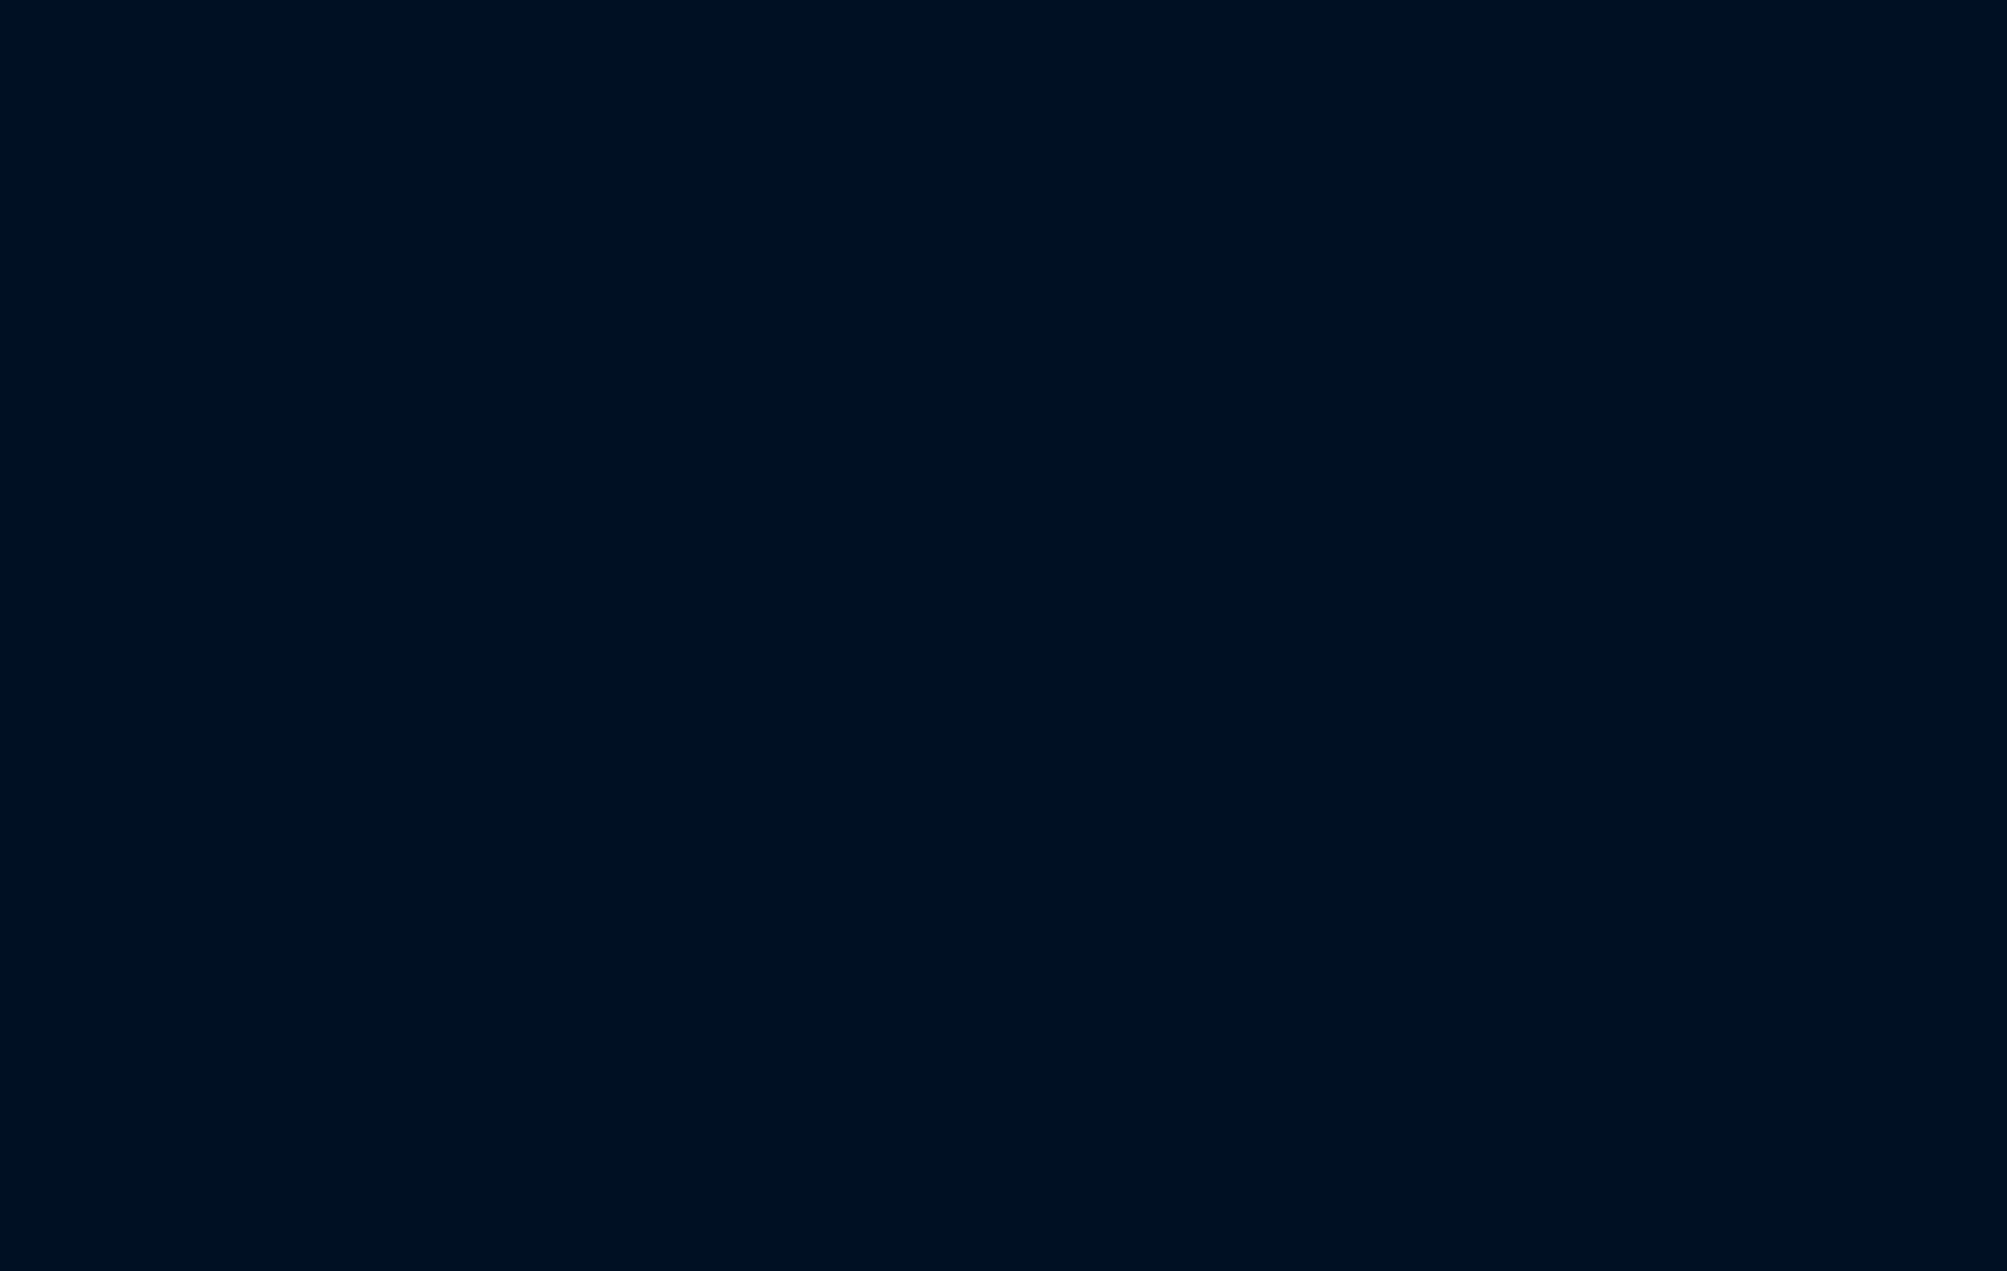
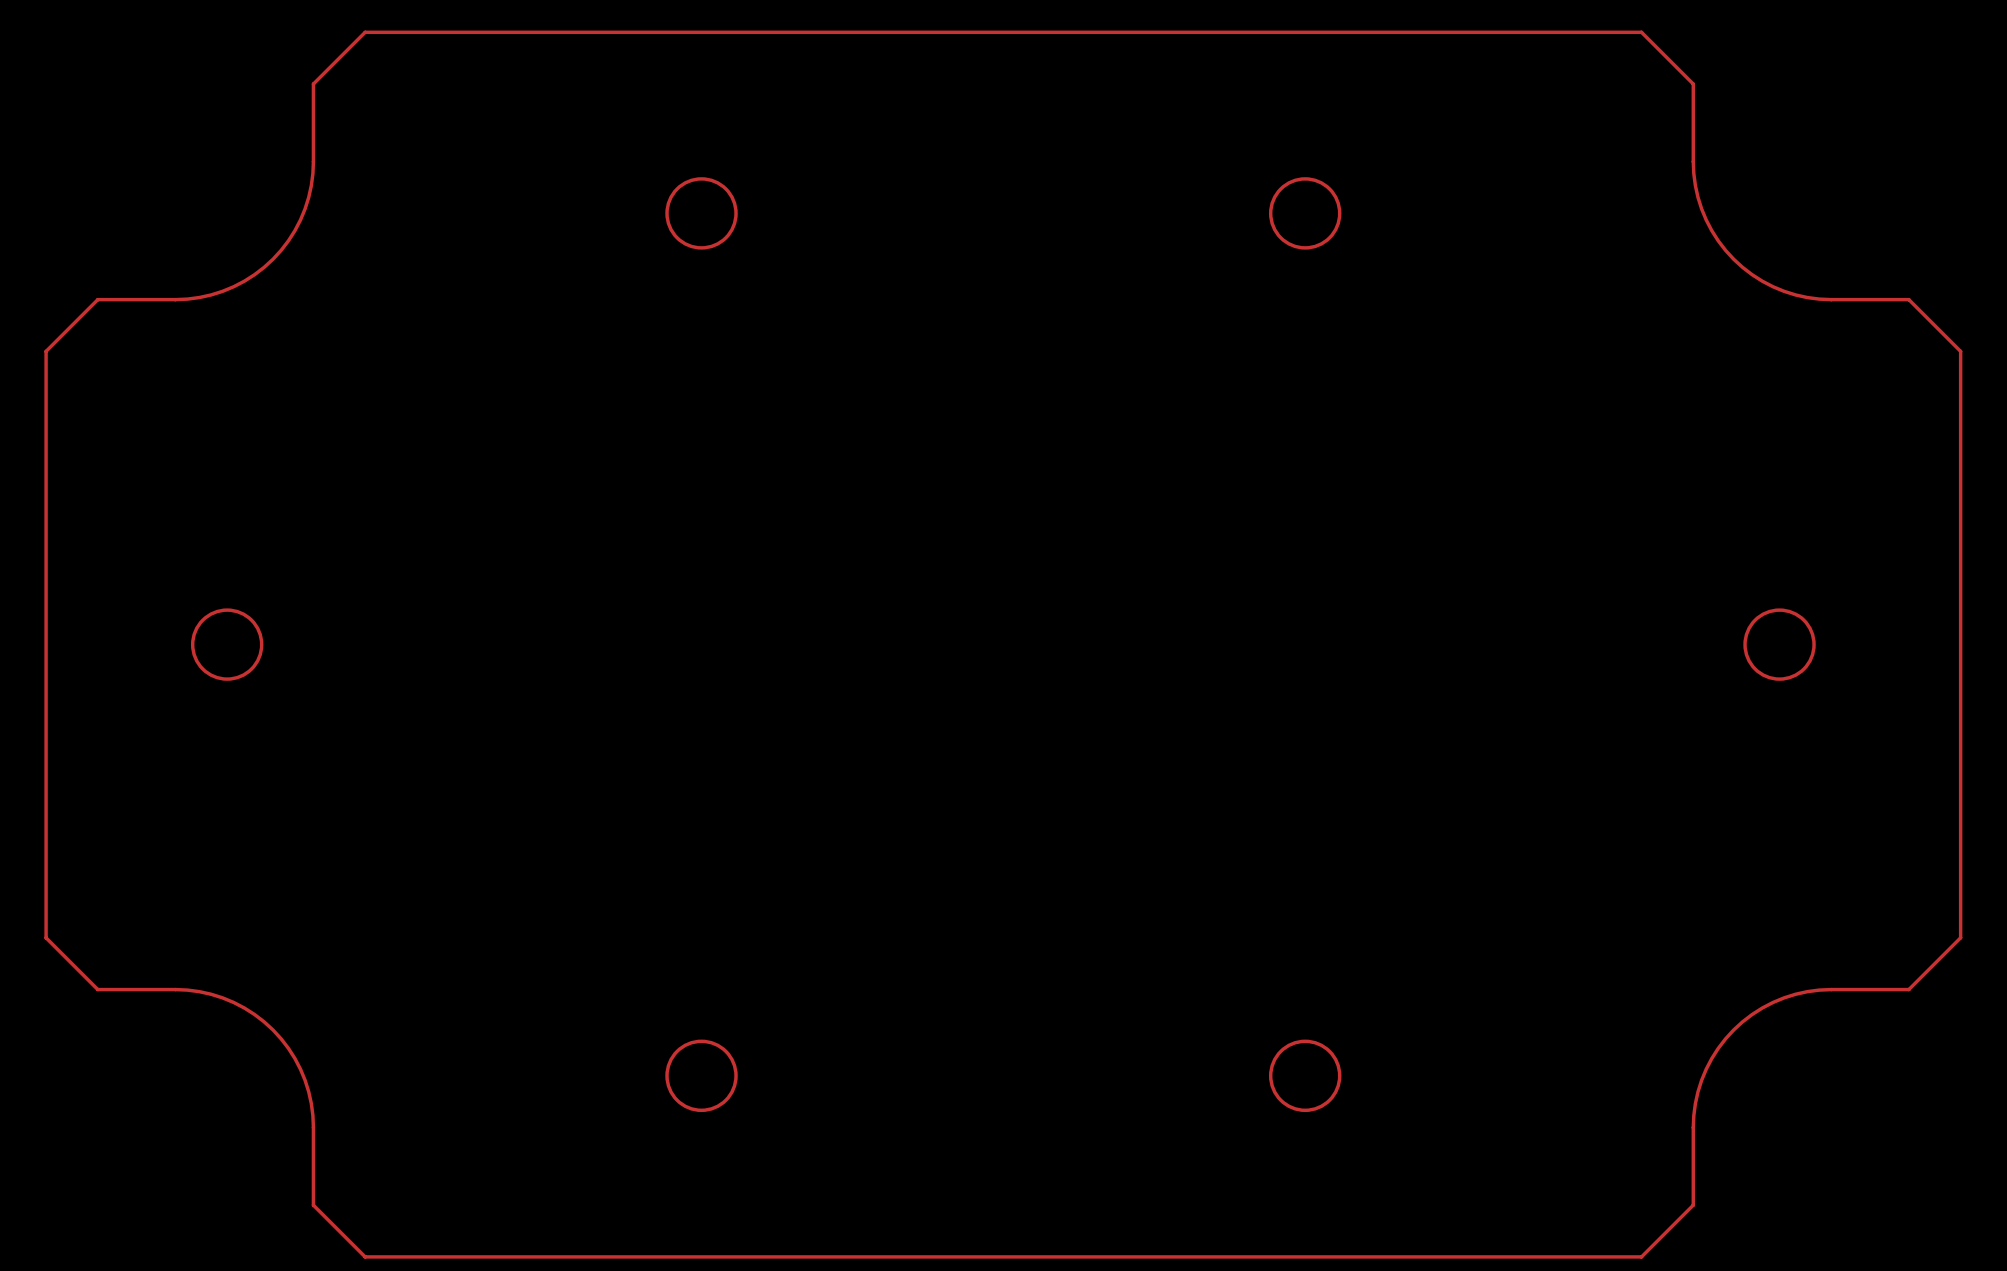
top track: none -> (1641, 32) (1693, 84) (1693, 161) (1697, 197) (1711, 230) (1733, 259) (1762, 281) (1795, 294) (1831, 299) (1908, 299) (1960, 351) (1960, 937) (1908, 989) (1831, 989) (1795, 994) (1762, 1008) (1733, 1029) (1711, 1058) (1697, 1091) (1693, 1127) (1693, 1205) (1641, 1256) (365, 1256) (313, 1205) (313, 1127) (308, 1091) (294, 1058) (273, 1029) (244, 1008) (211, 994) (175, 989) (97, 989) (46, 937) (46, 351) (97, 299) (175, 299) (211, 294) (244, 281) (273, 259) (294, 230) (308, 197) (313, 161) (313, 84) (365, 32) (1641, 32)
drawing: none -> [665, 177, 738, 250]
drawing: none -> [1268, 177, 1342, 250]
drawing: none -> [190, 608, 264, 681]
drawing: none -> [1743, 608, 1816, 681]
drawing: none -> [665, 1039, 738, 1113]
drawing: none -> [1268, 1039, 1342, 1113]

